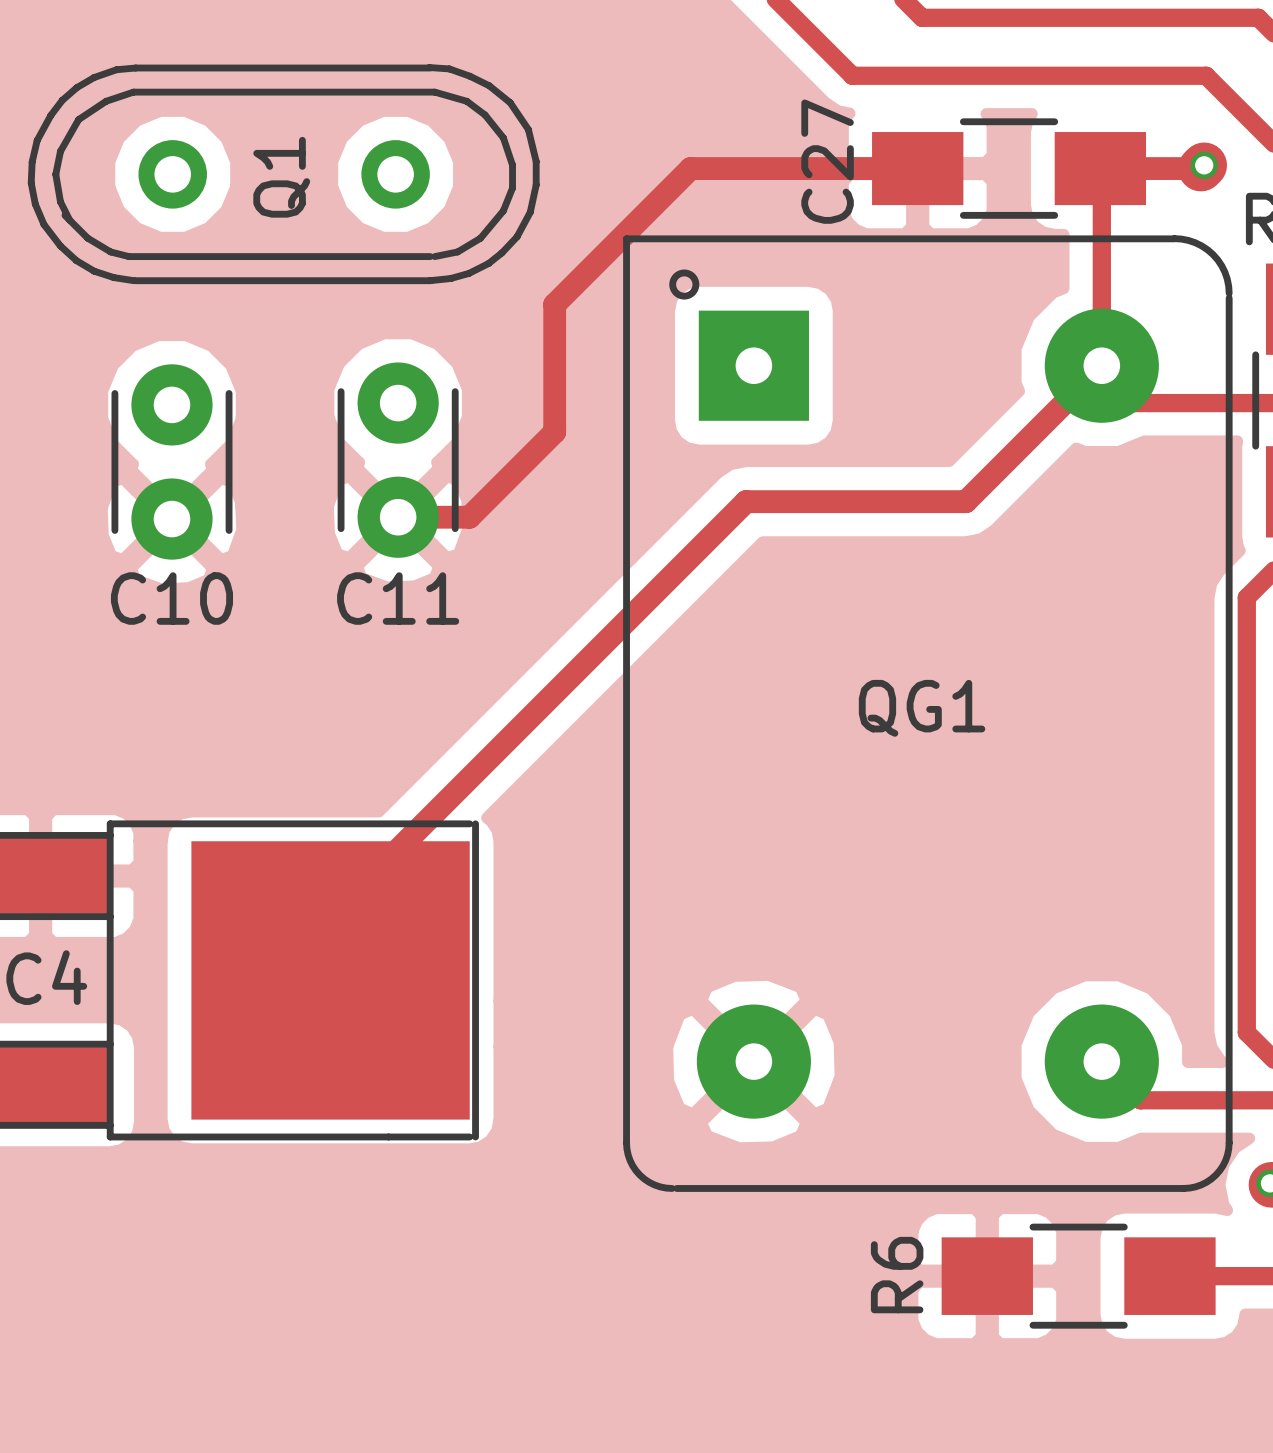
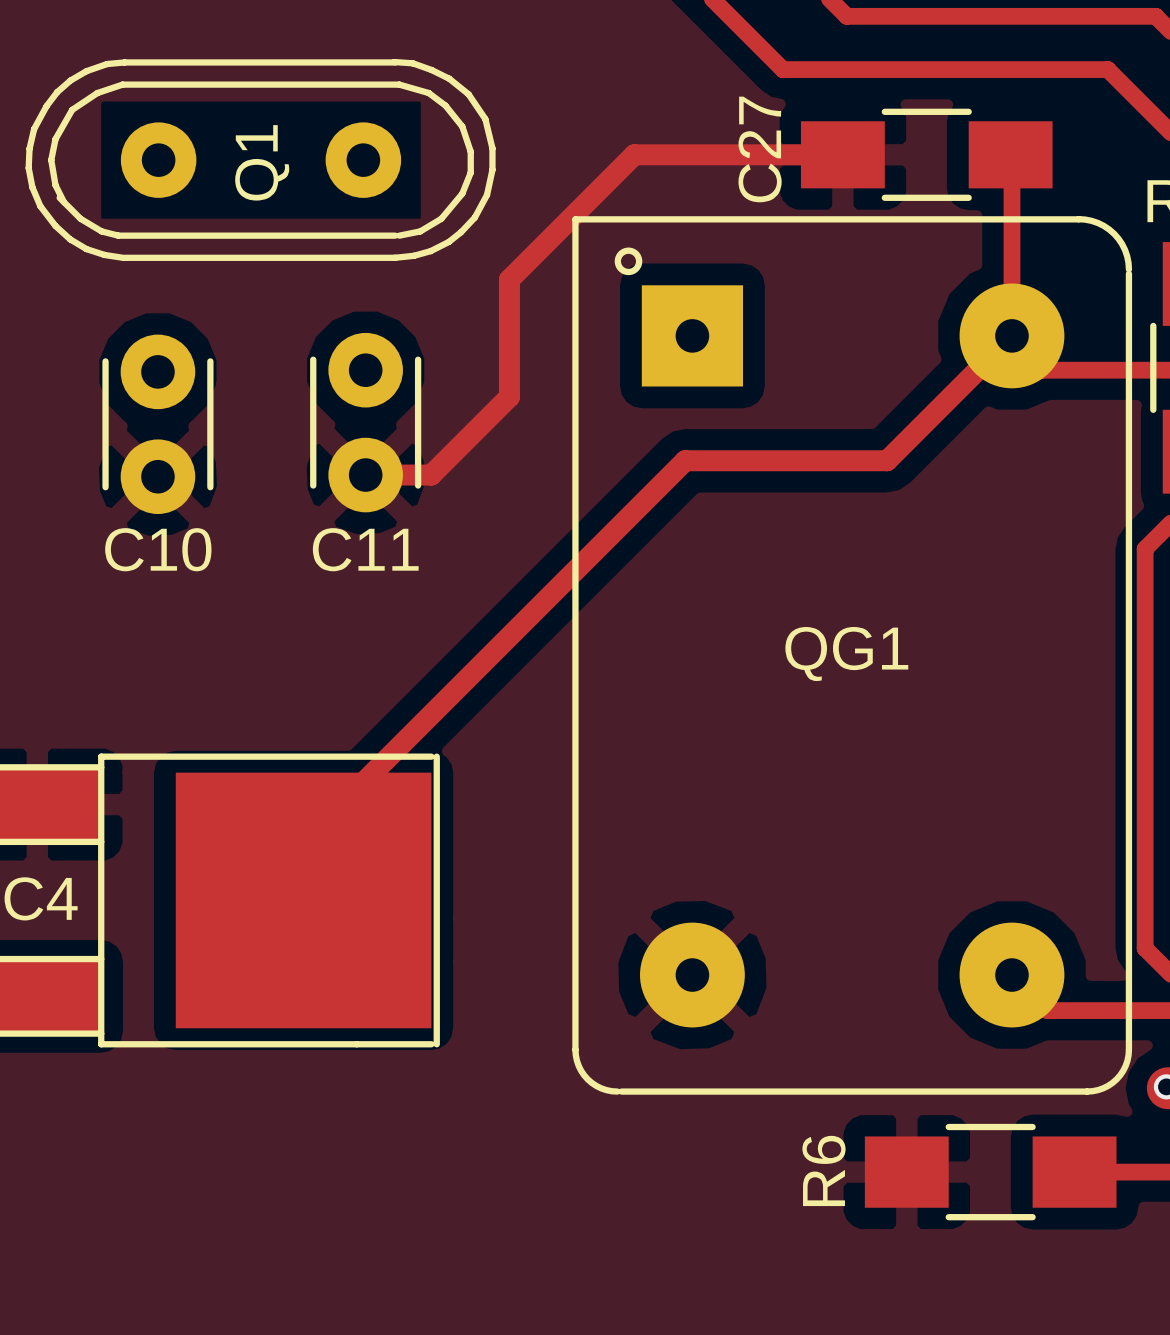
Q1 footprint: [27, 64, 540, 285] -> [25, 58, 496, 261]
track: (1204, 165) (1200, 168) (1100, 168) -> none
via: (1204, 165) -> none

